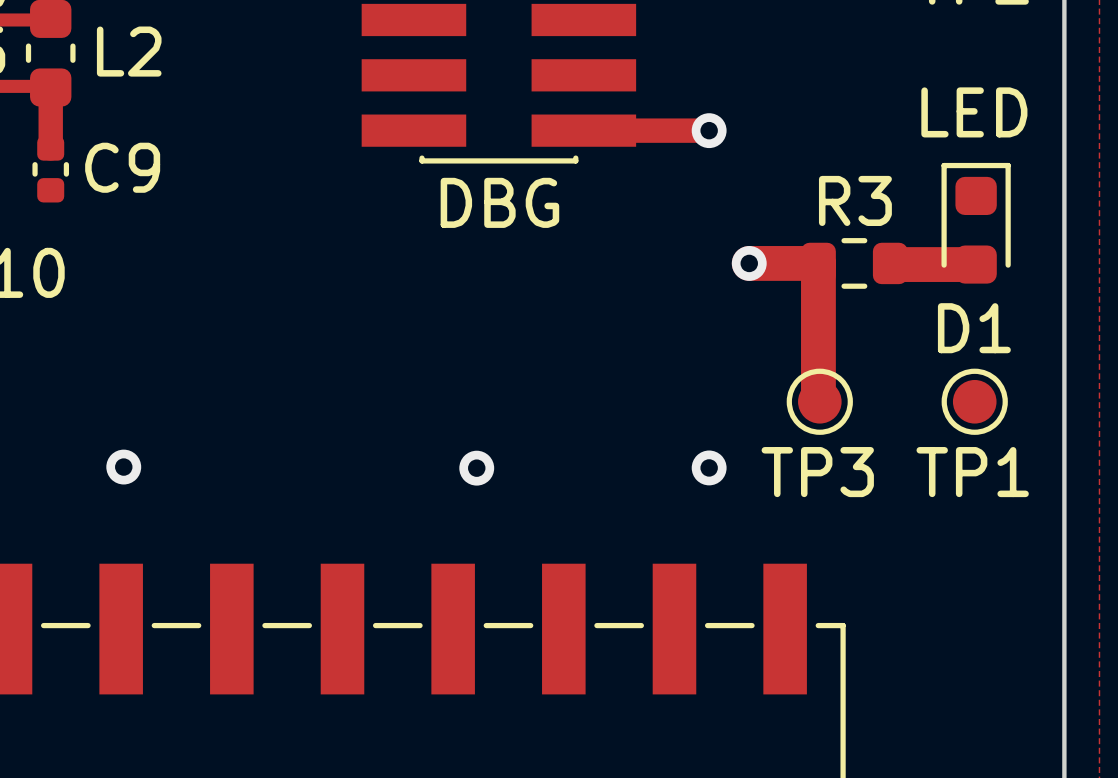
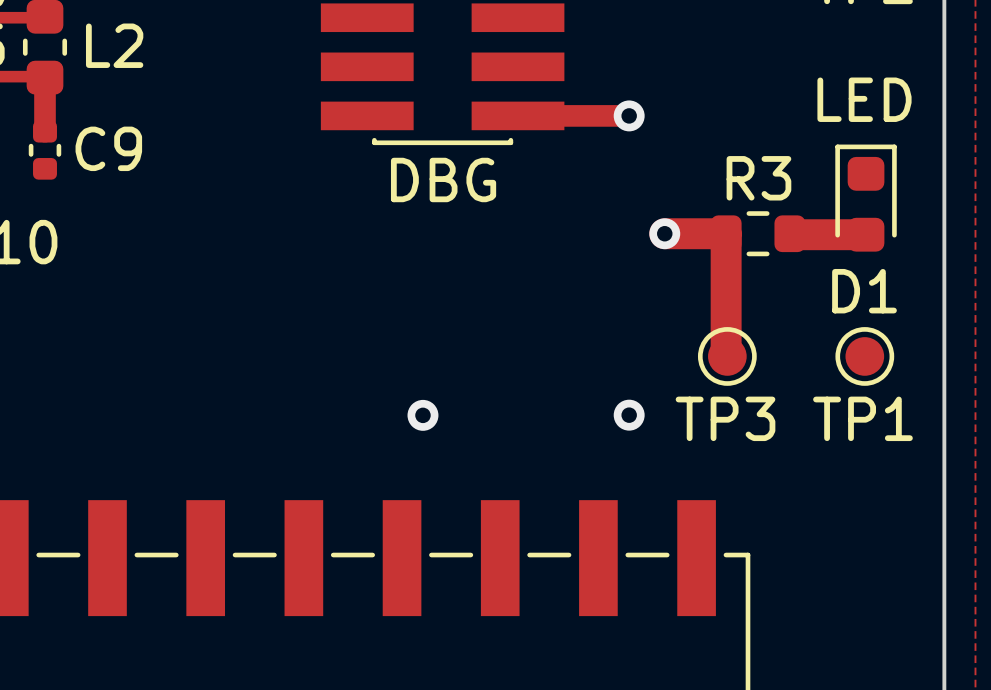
via: (123, 467) -> none

